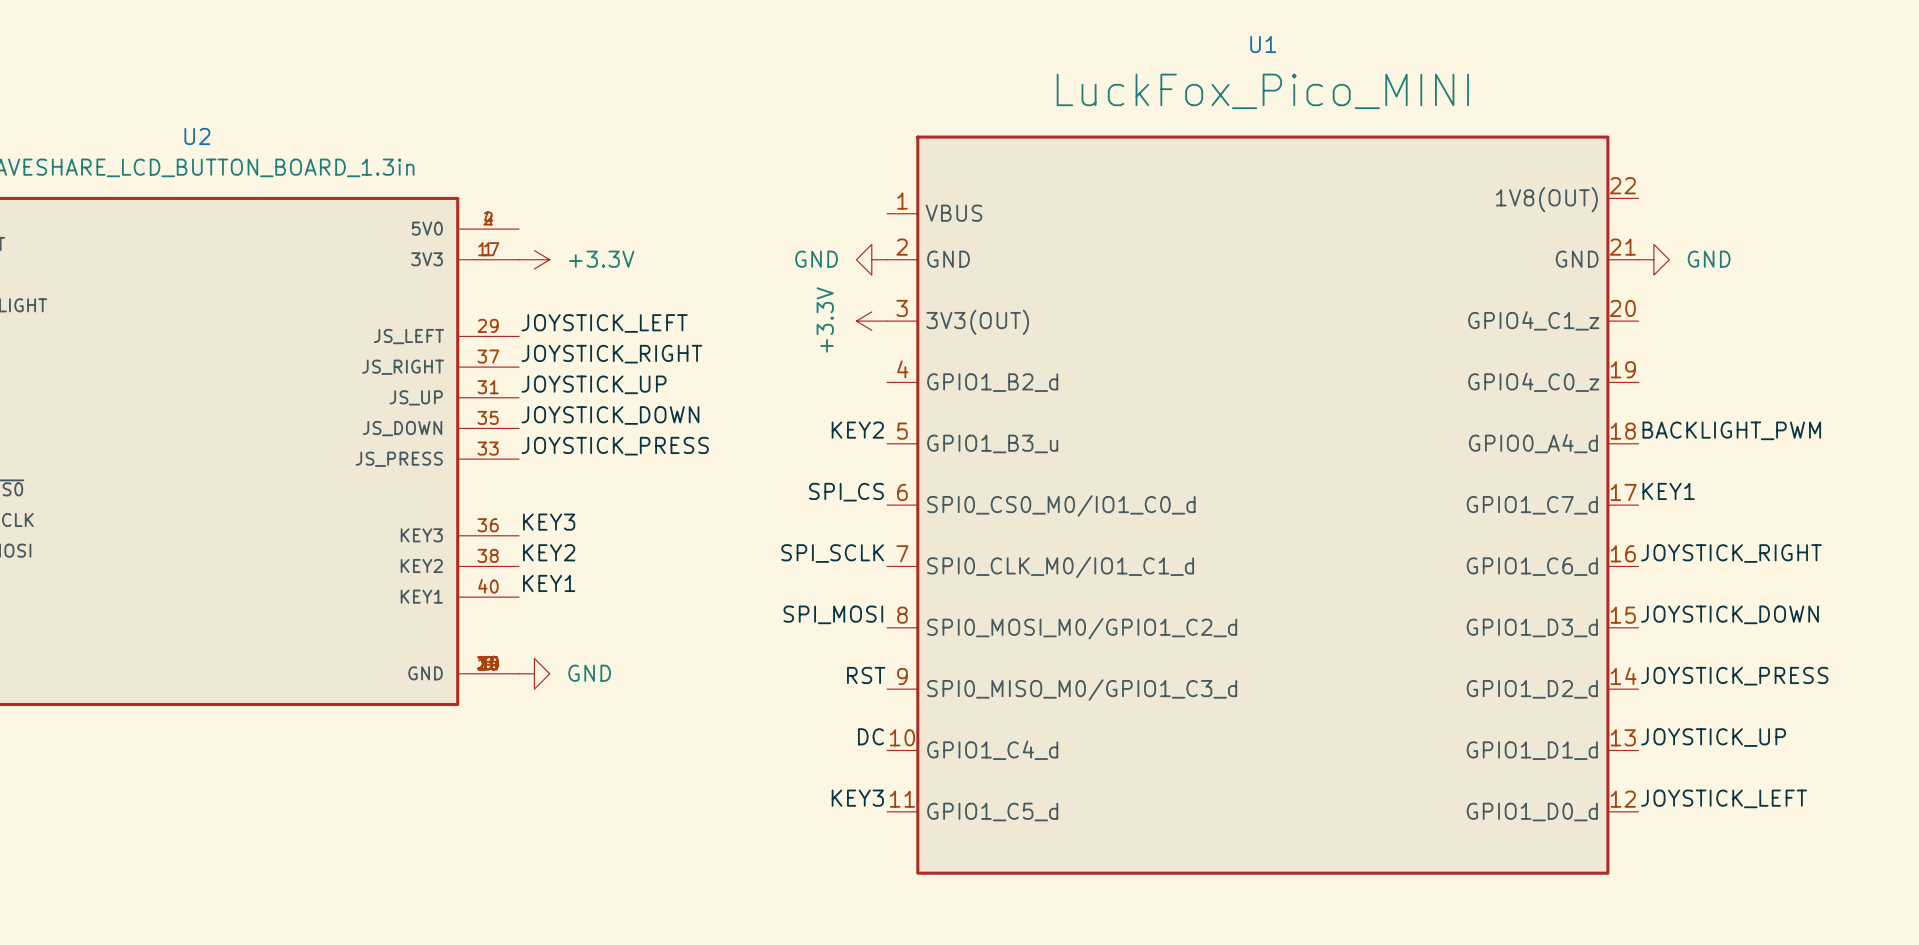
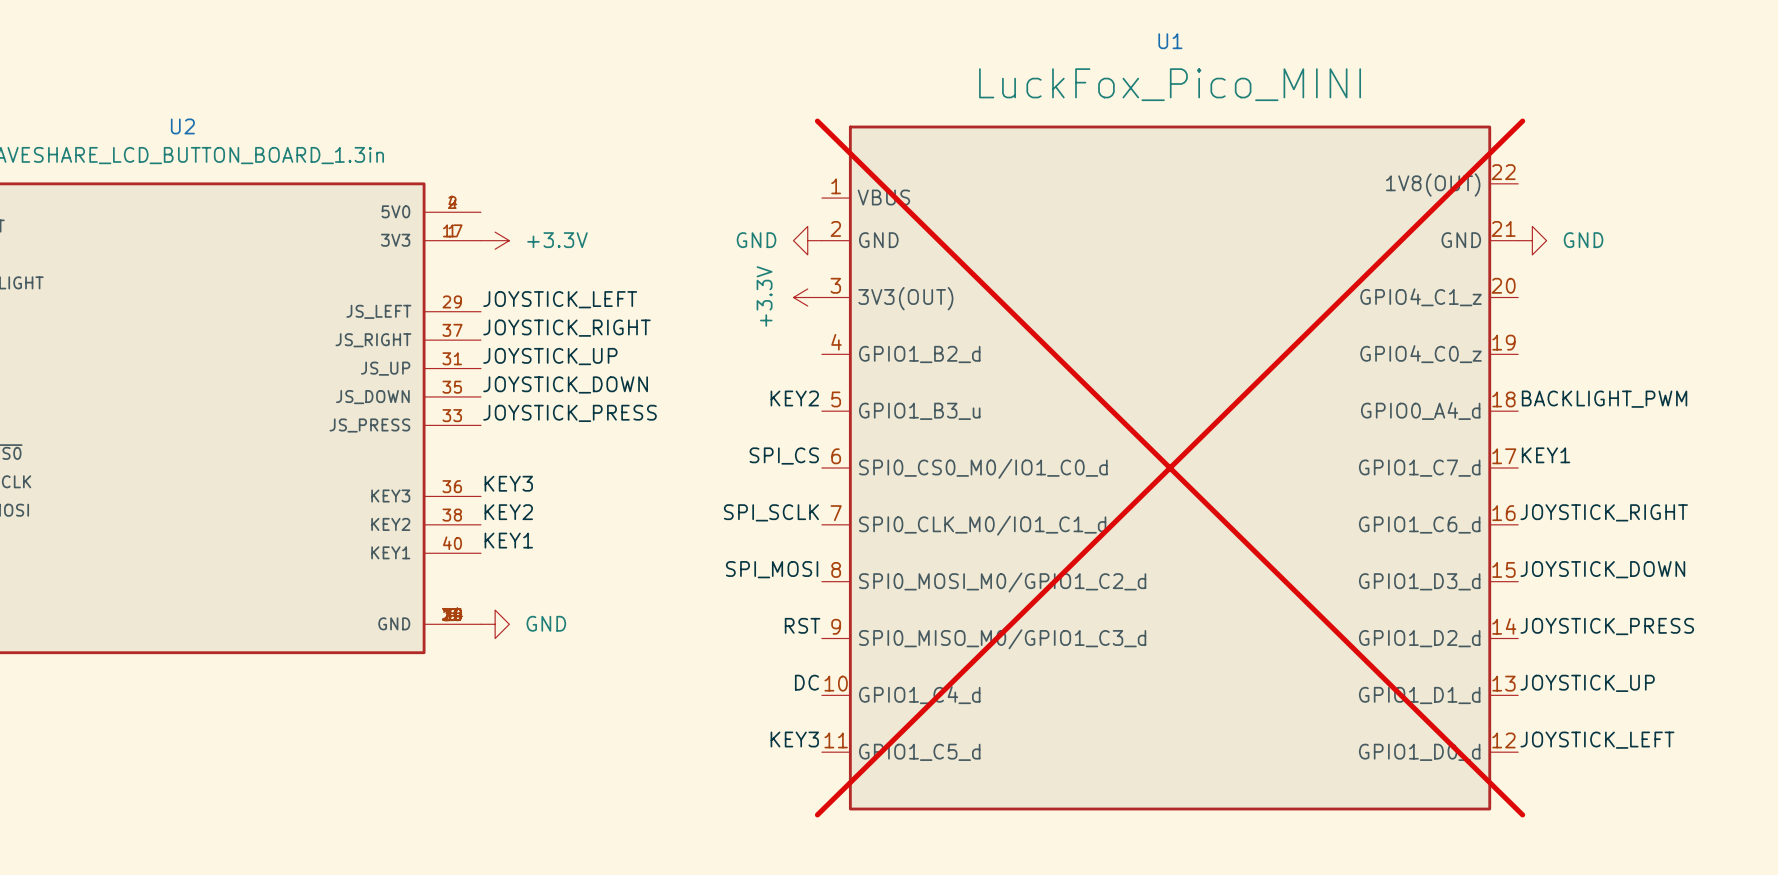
U1 do-not-place cross: none -> (1170, 468)

